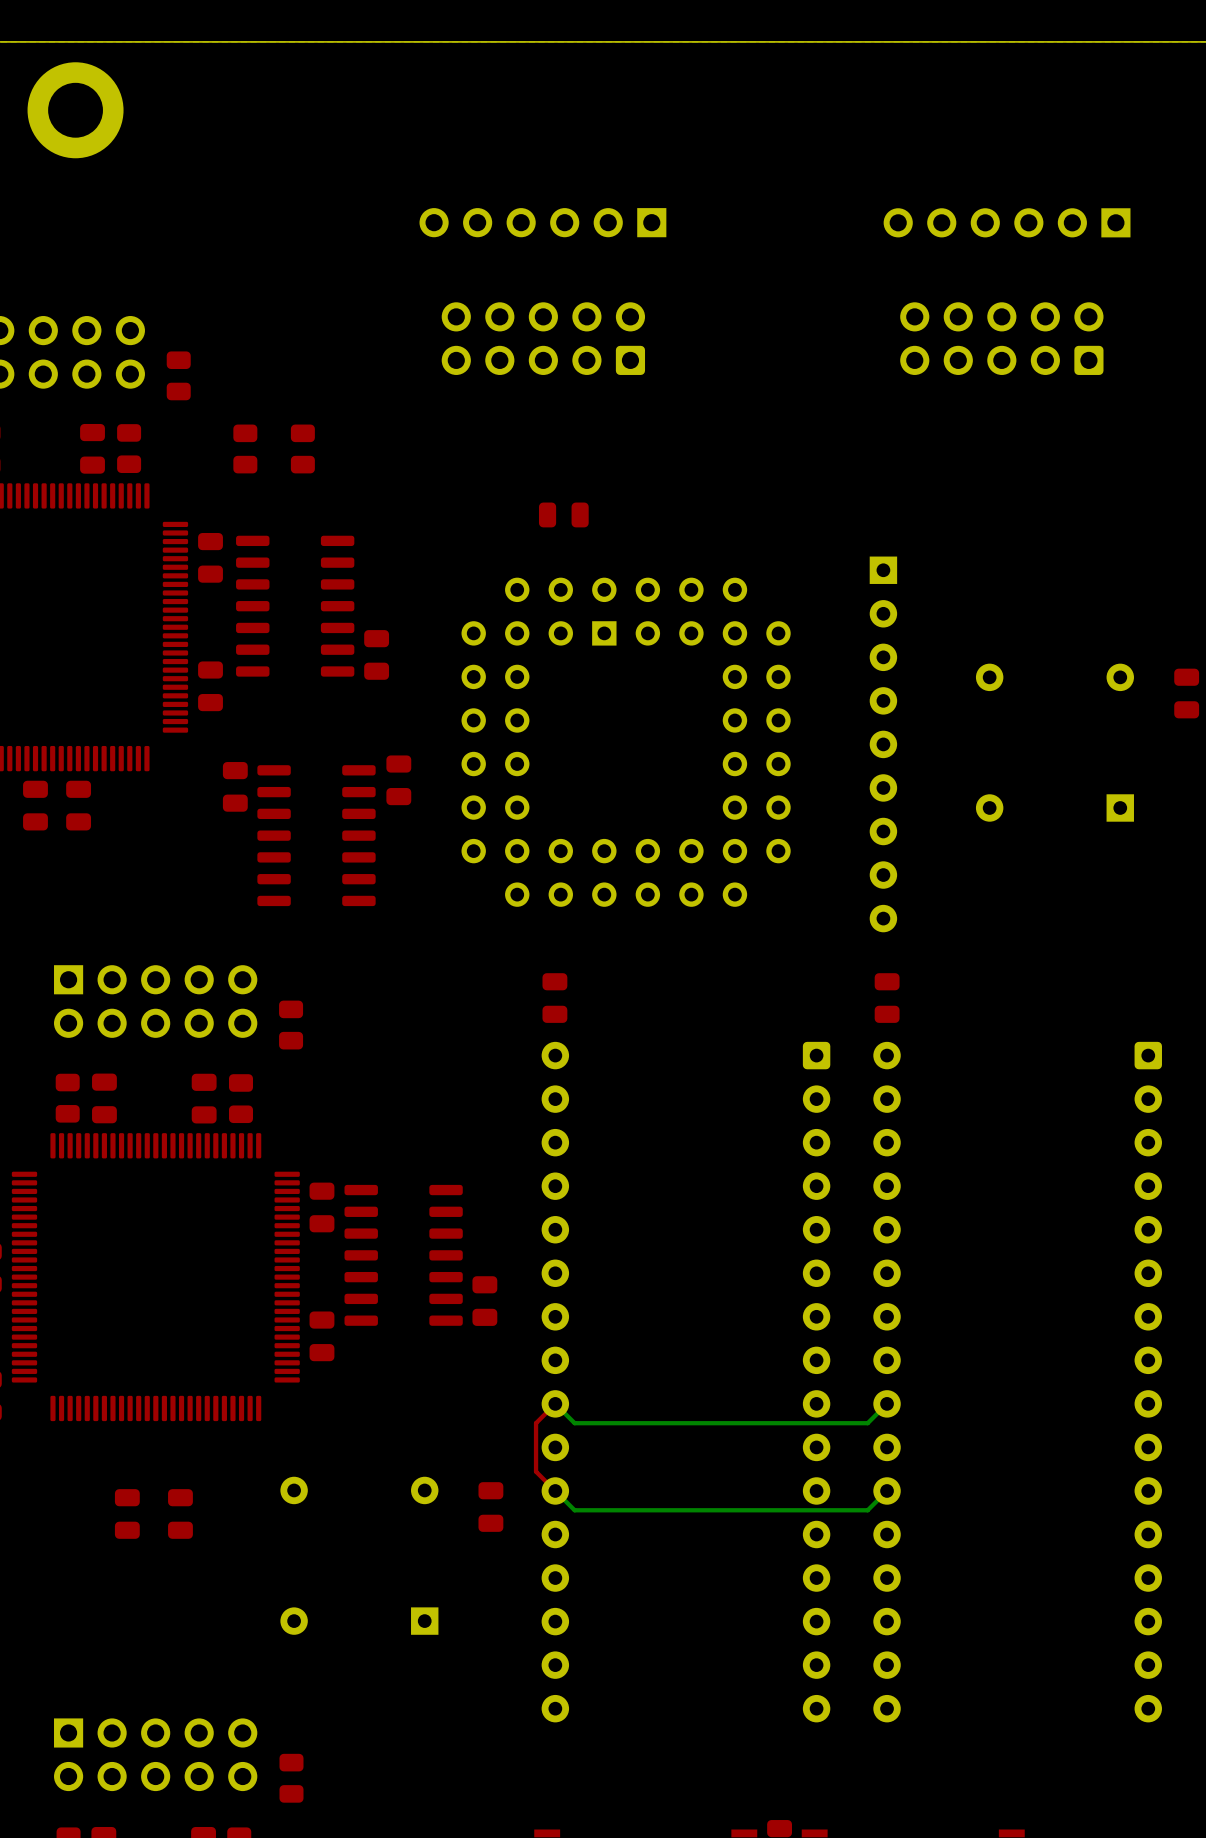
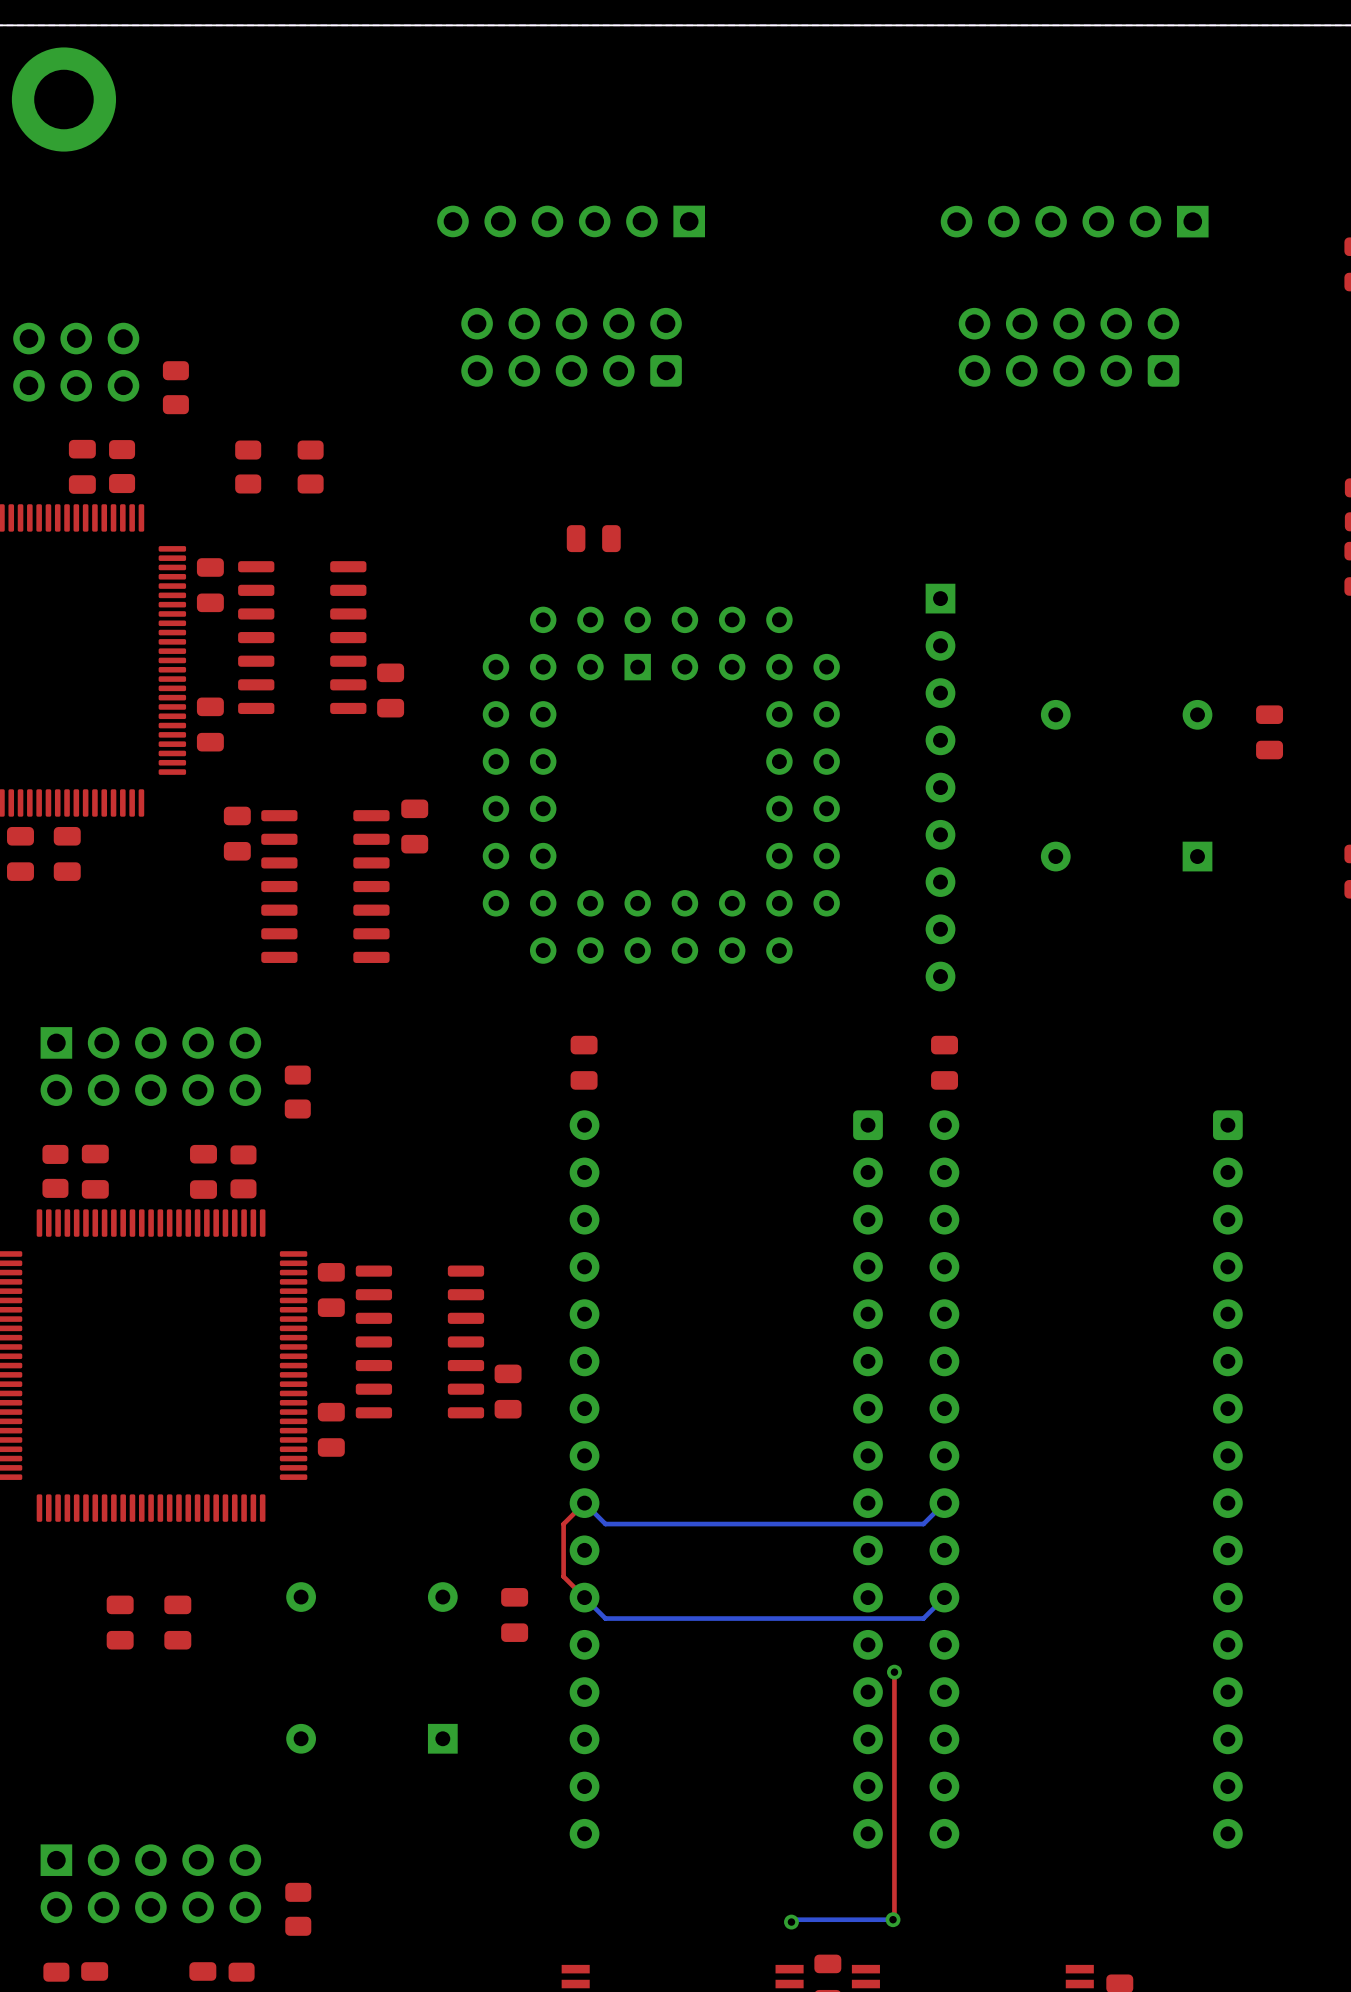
top track: none -> (894, 1672) (893, 1919)
via: none -> (894, 1672)
bottom track: none -> (893, 1919) (793, 1919) (791, 1922)
via: none -> (893, 1919)
via: none -> (791, 1922)

